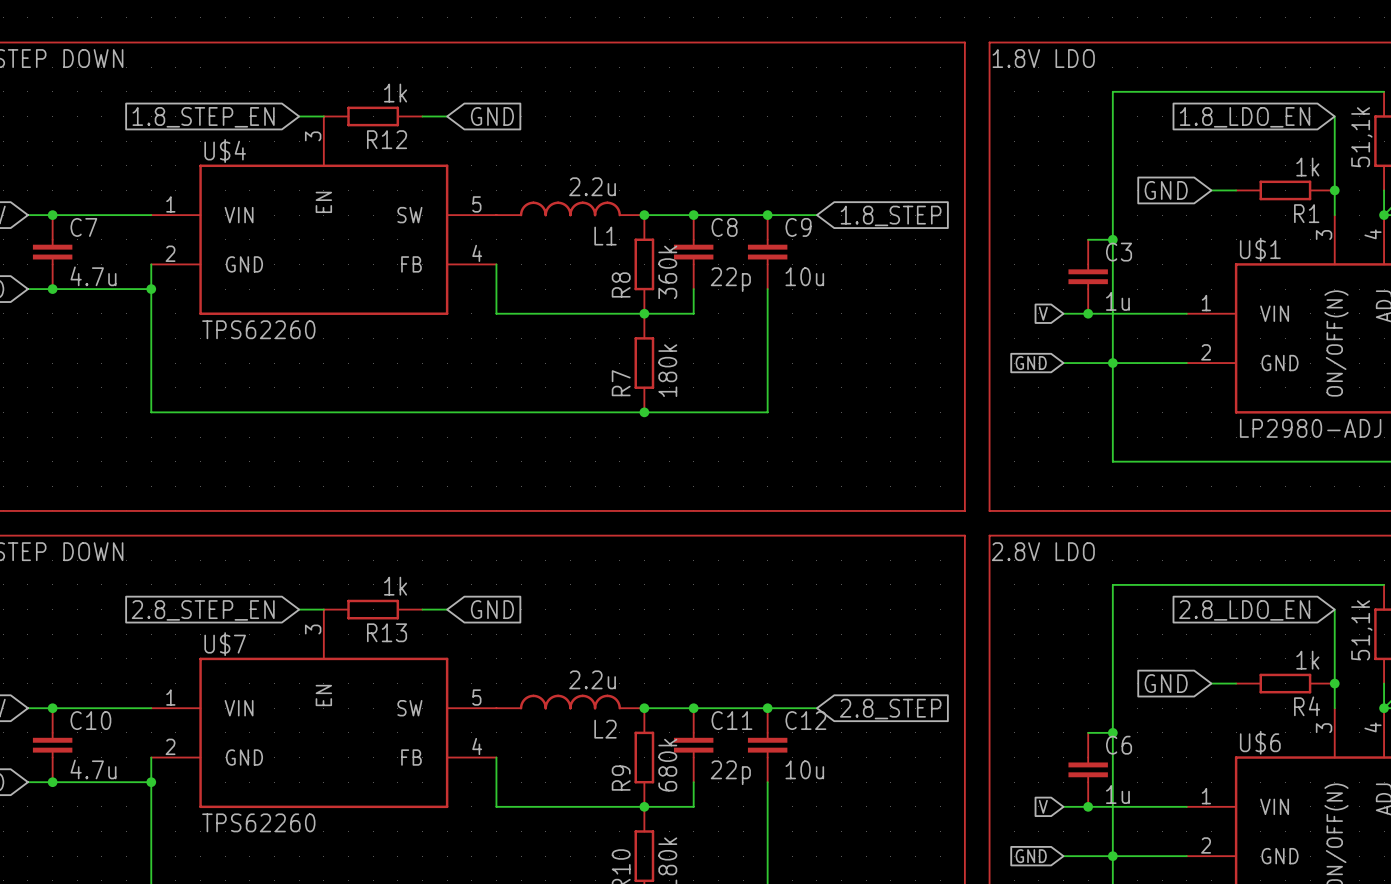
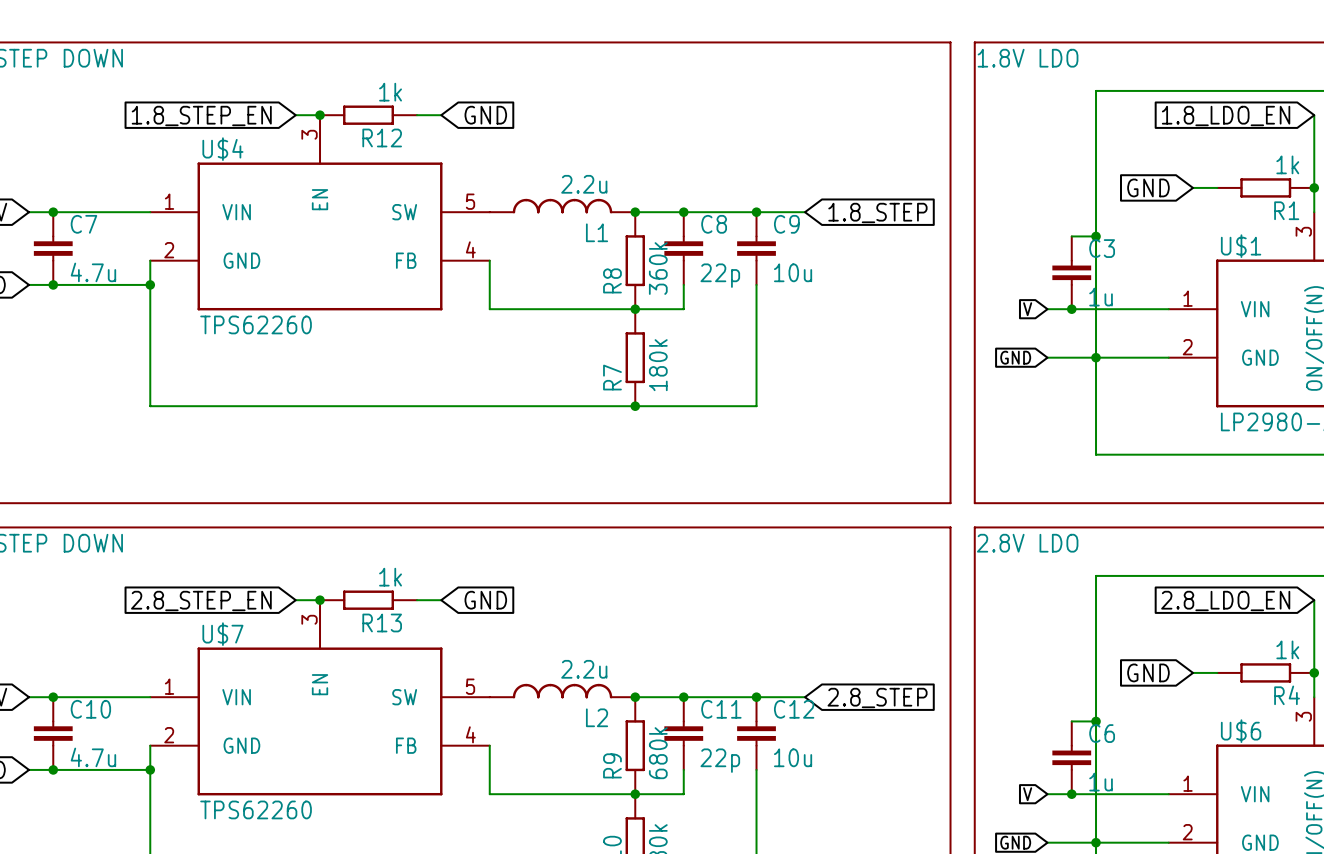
junction: none -> (320, 115)
junction: none -> (320, 600)

